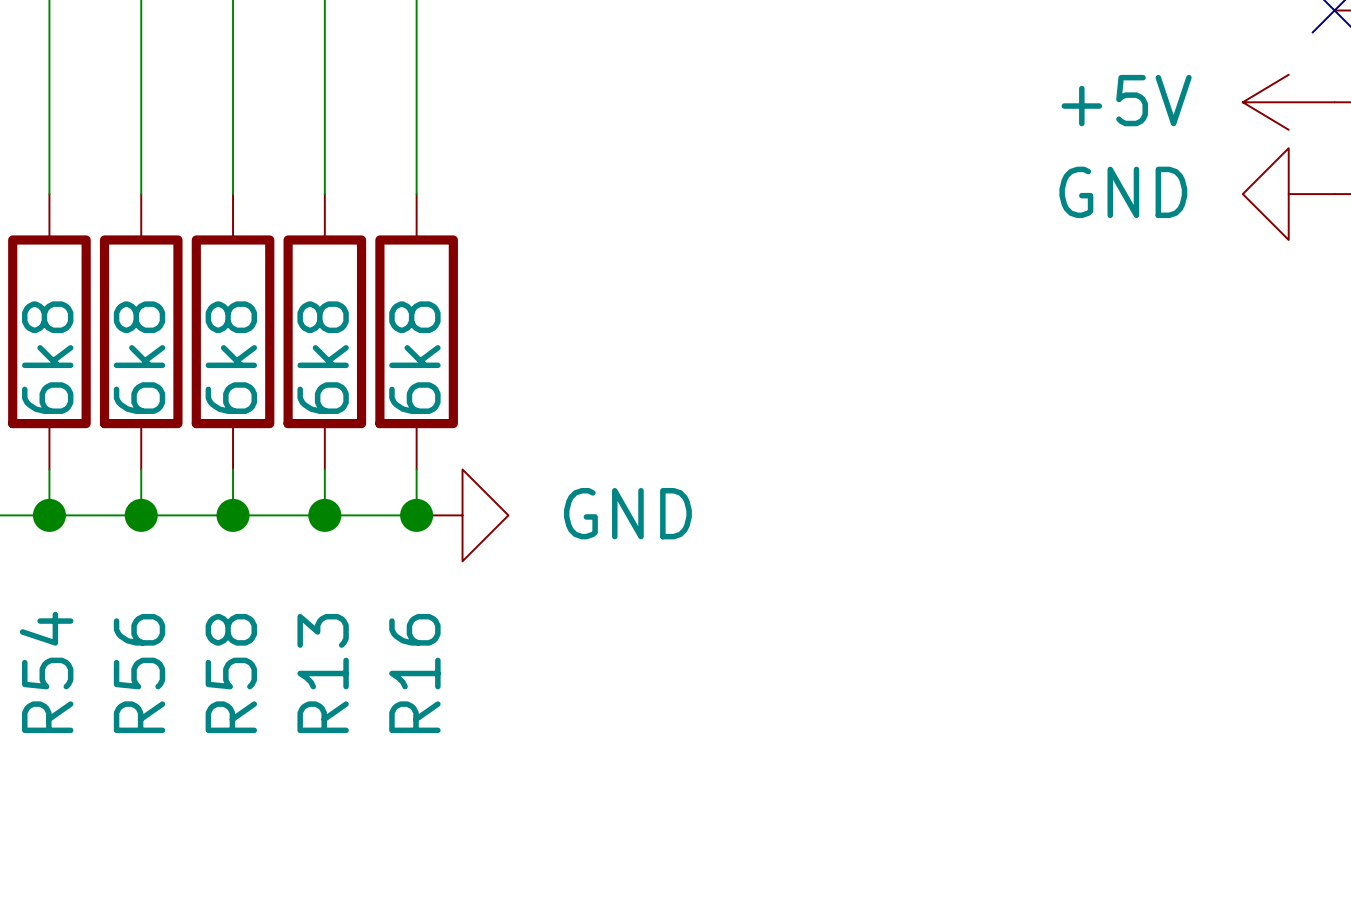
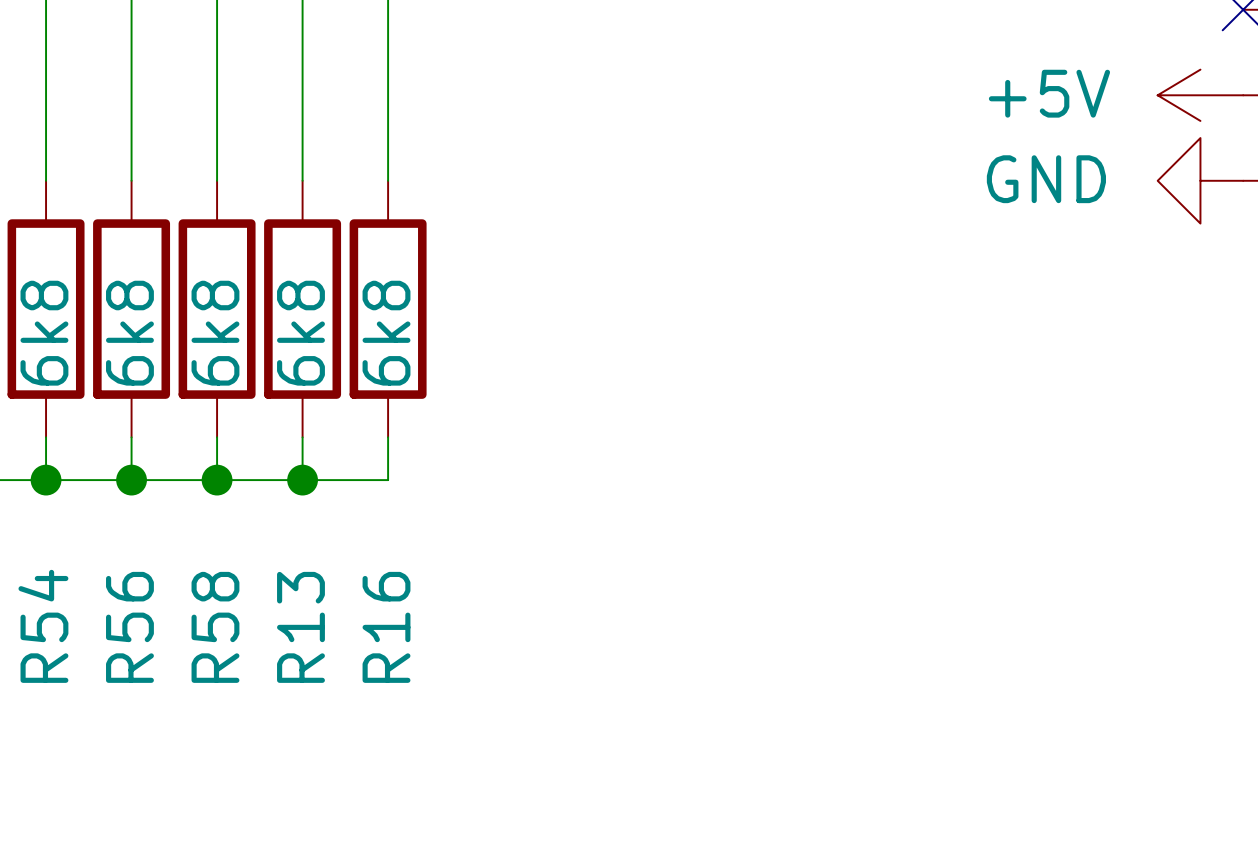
junction: (416, 515) -> none
power symbol: GND (462, 515) -> none

